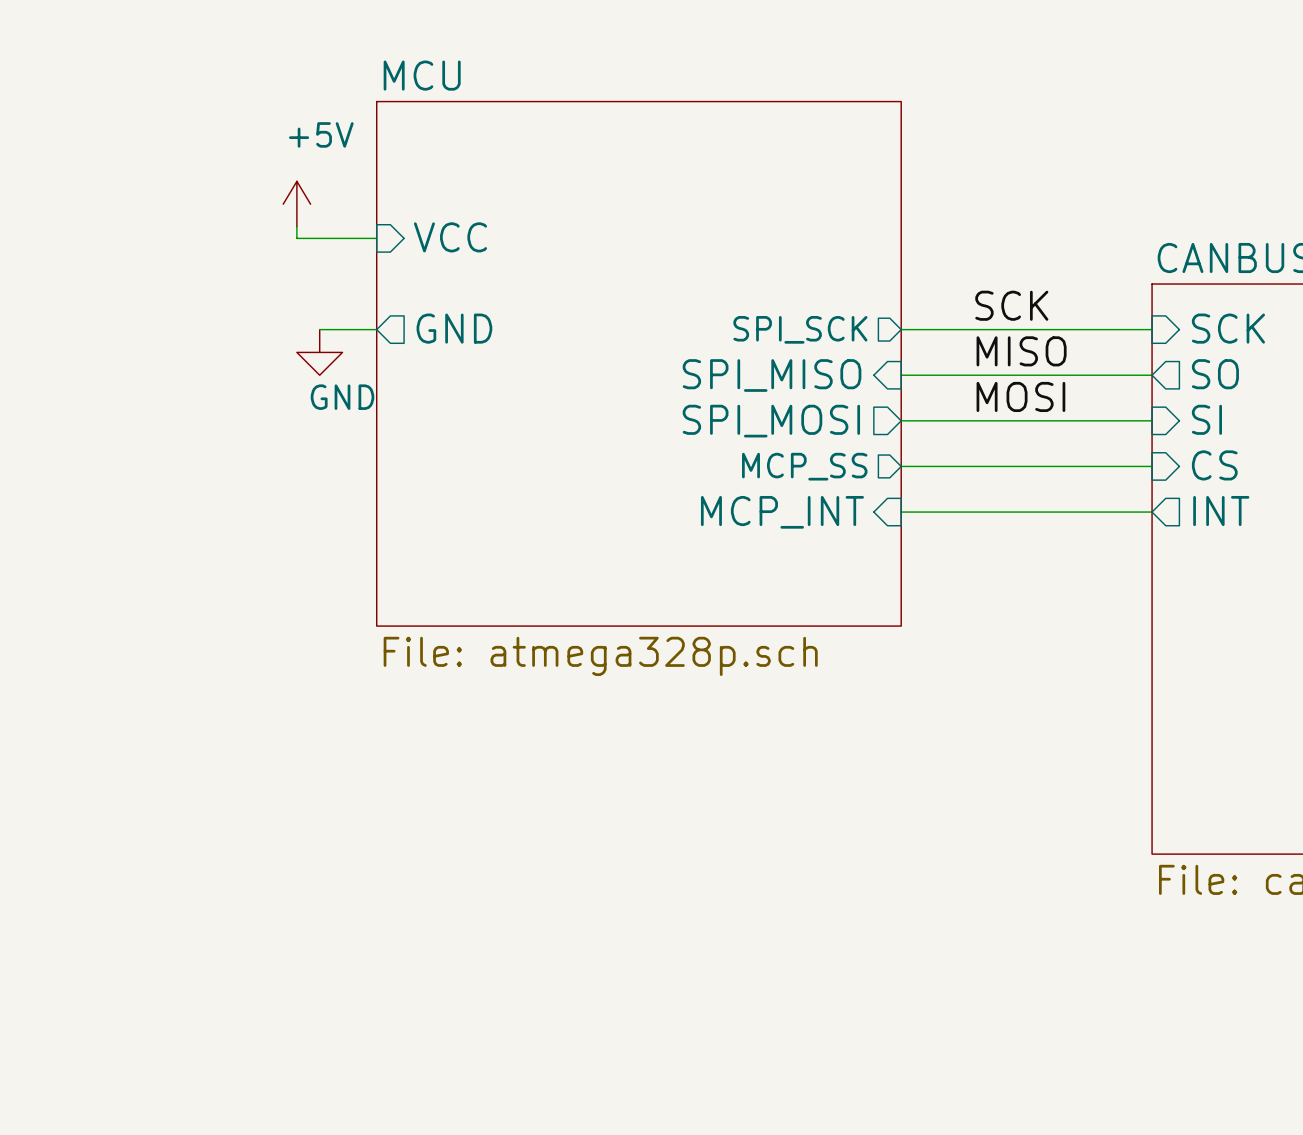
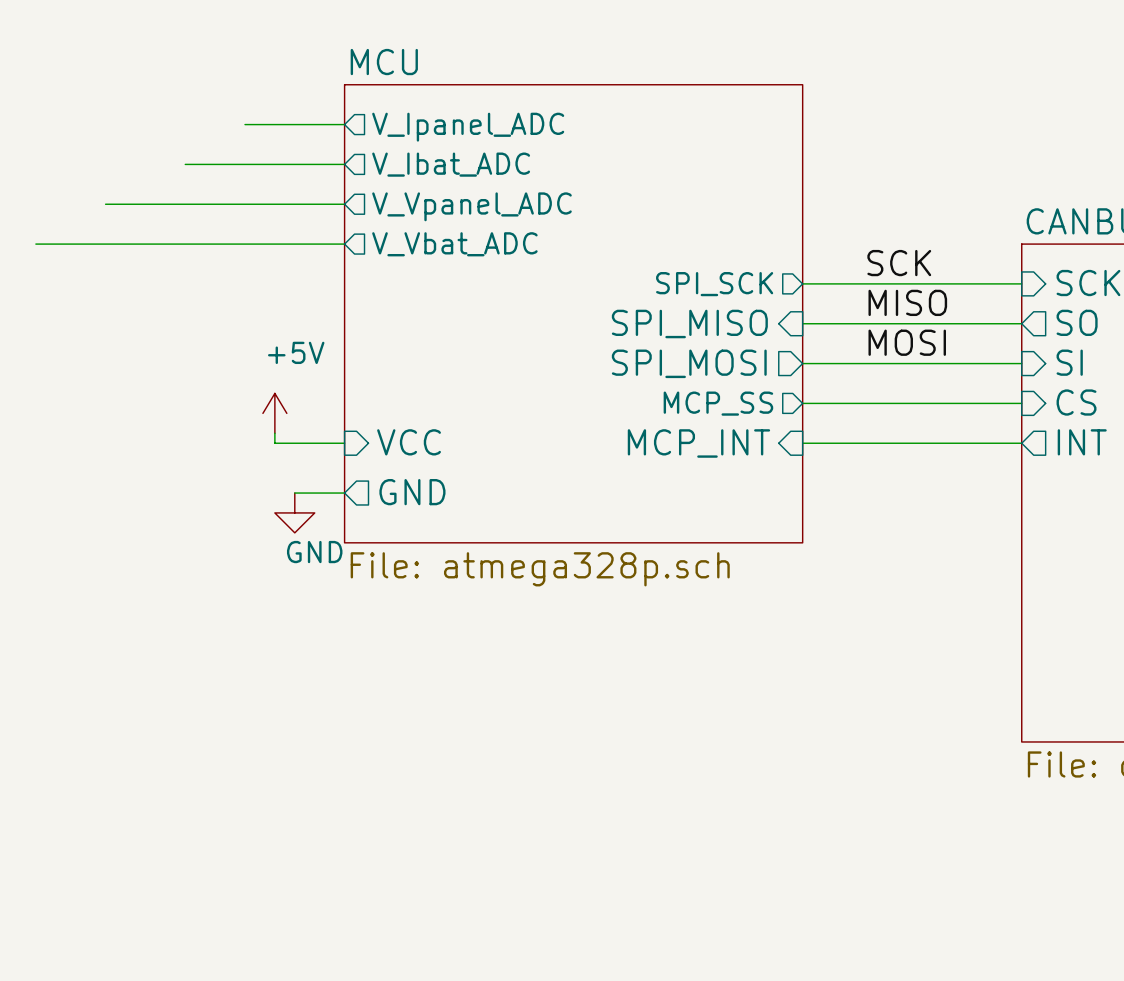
wire: none -> (245, 124) (344, 124)
sheet pin: none -> V_Ipanel_ADC (468, 127)
wire: none -> (185, 164) (344, 164)
sheet pin: none -> V_Ibat_ADC (451, 164)
power symbol position: +5V (296, 204) -> +5V (274, 413)
wire: (296, 227) (296, 238) -> (105, 204) (274, 204)
sheet pin position: VCC (450, 237) -> VCC (409, 442)
sheet pin: none -> V_Vpanel_ADC (471, 206)
wire: none -> (35, 244) (344, 244)
sheet pin: none -> V_Vbat_ADC (454, 244)
sheet pin position: GND (454, 328) -> GND (412, 492)
wire: (319, 329) (376, 329) -> (294, 493) (344, 493)
power symbol position: GND (319, 352) -> GND (294, 512)
wire: none -> (274, 433) (274, 443) (344, 443)

